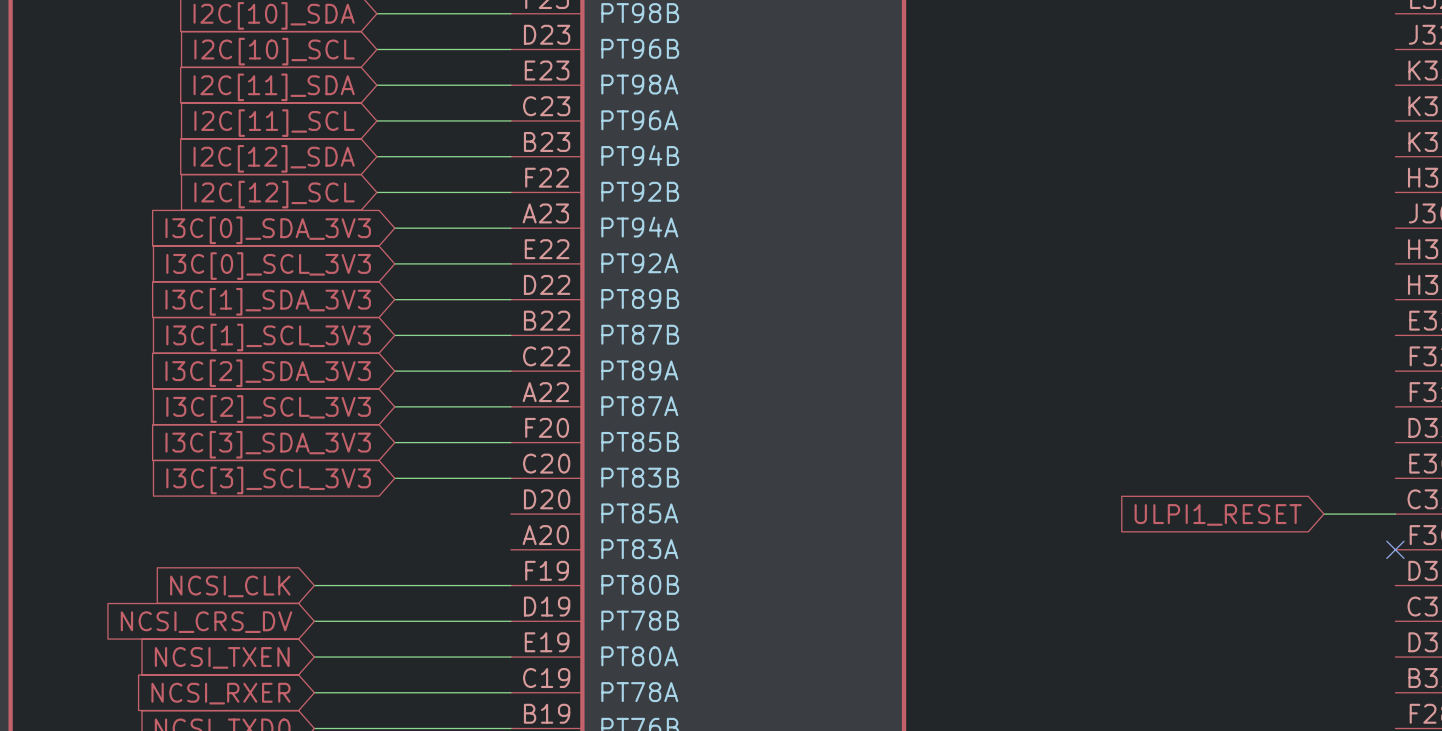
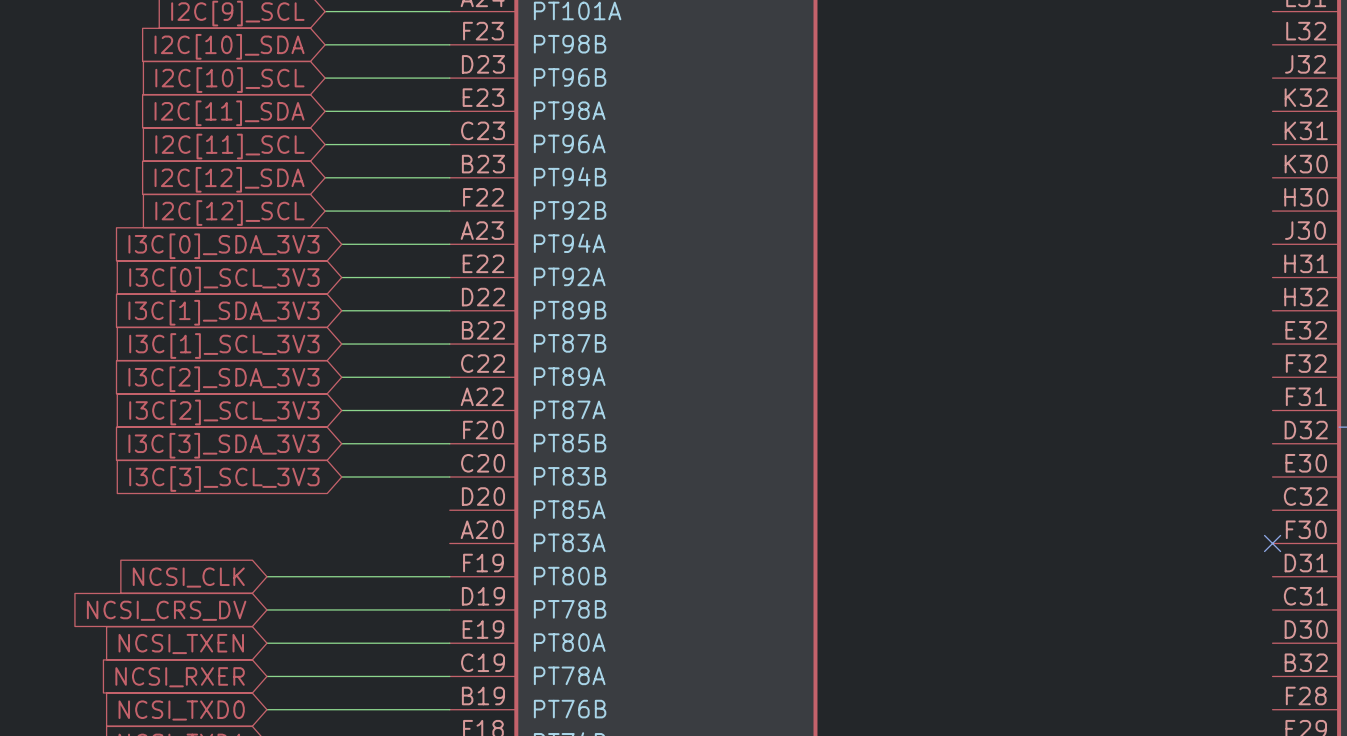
global label: ULPI1_RESET (1218, 514) -> none
wire: (1323, 514) (1395, 514) -> none

